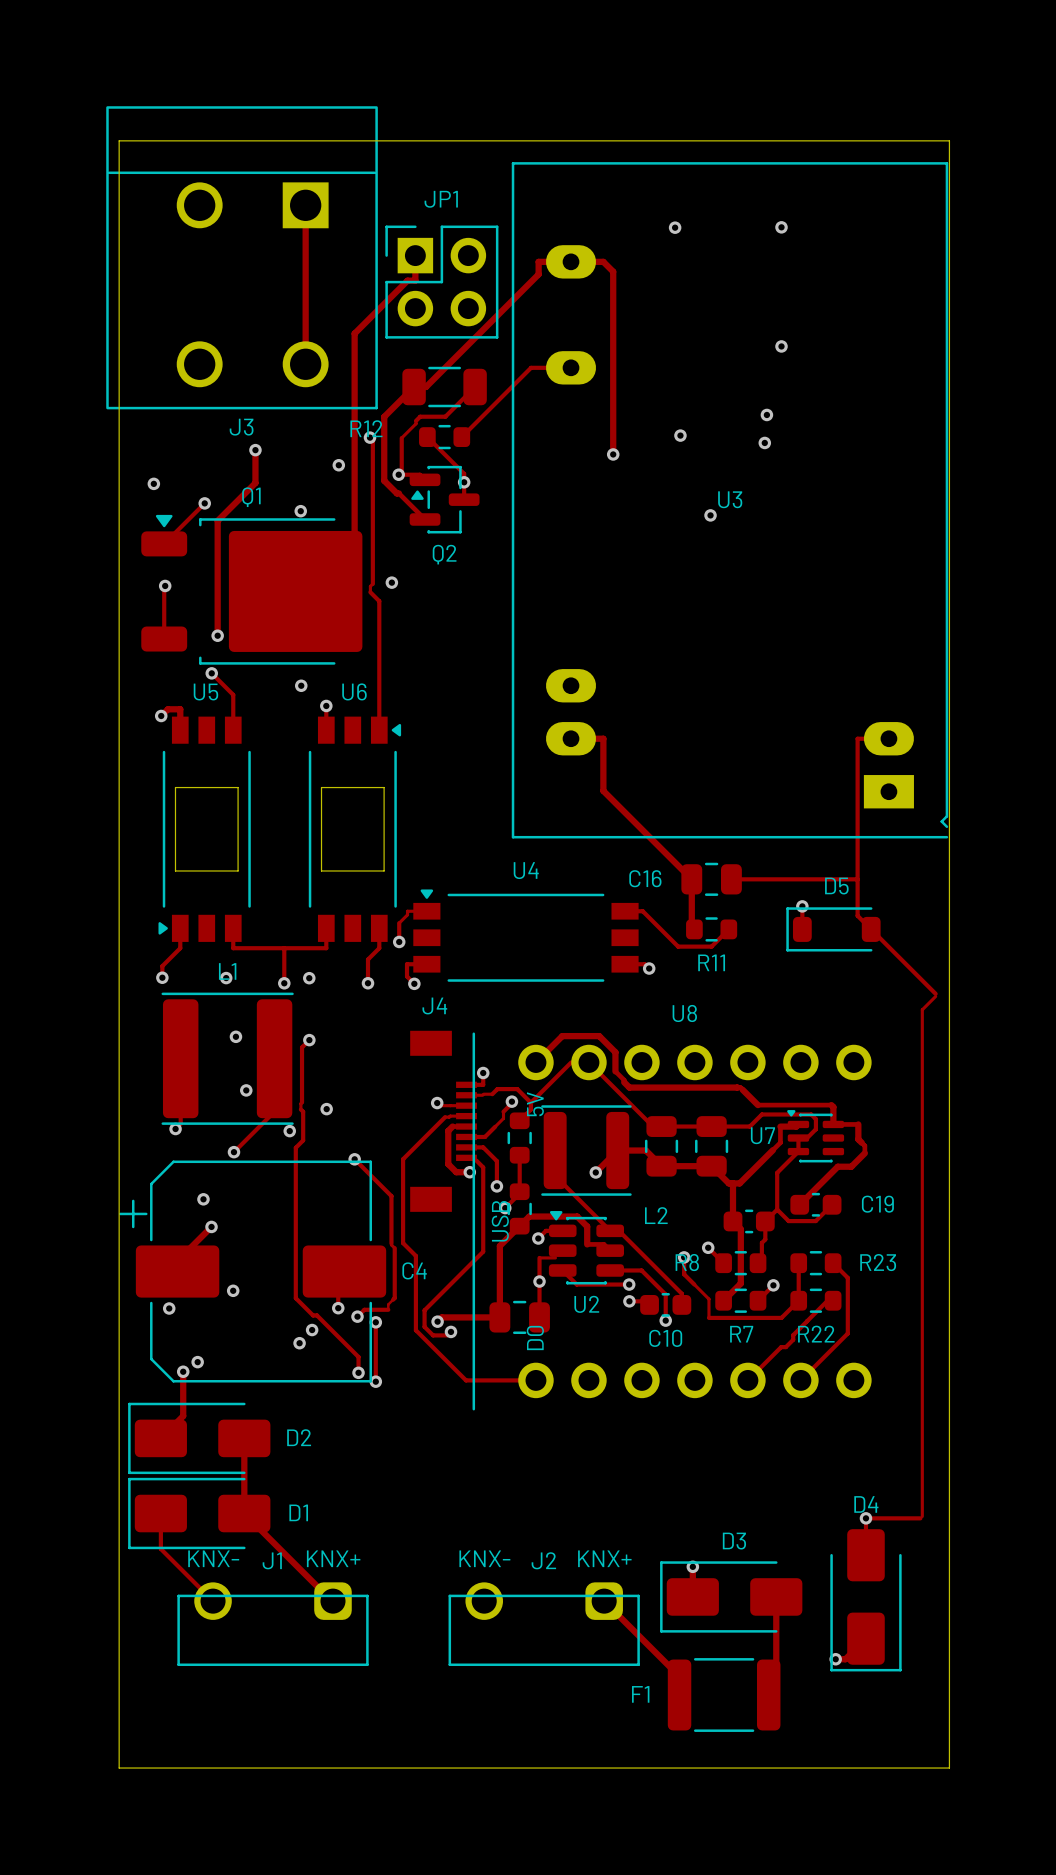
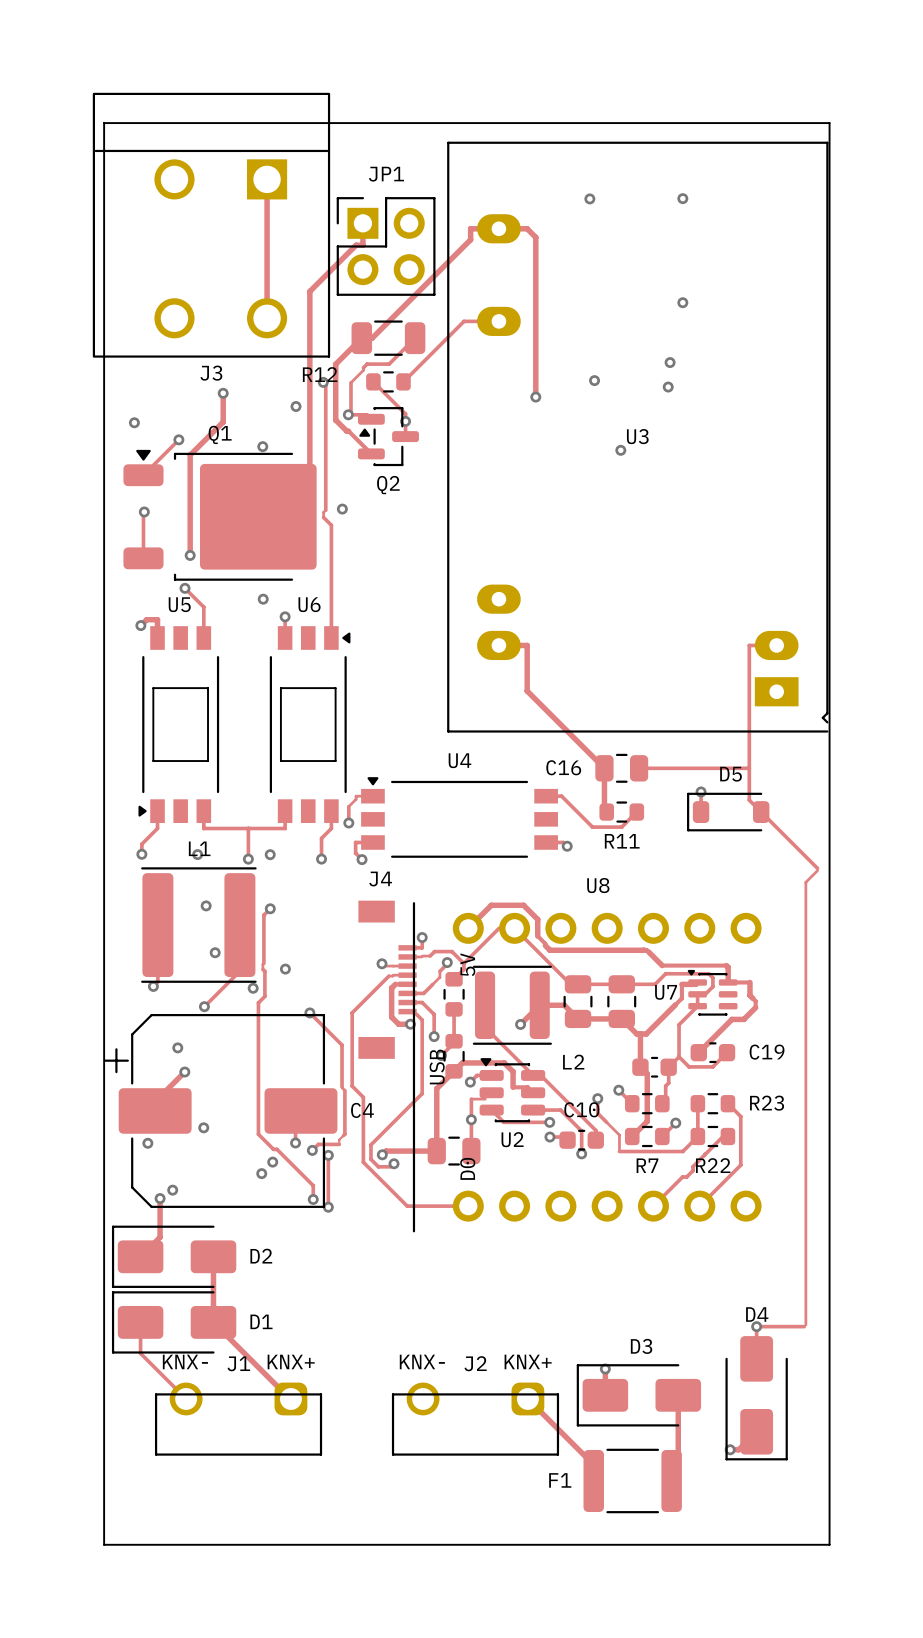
R8 name: R8 (687, 1262) -> none
C10 name position: C10 (665, 1338) -> C10 (581, 1109)

